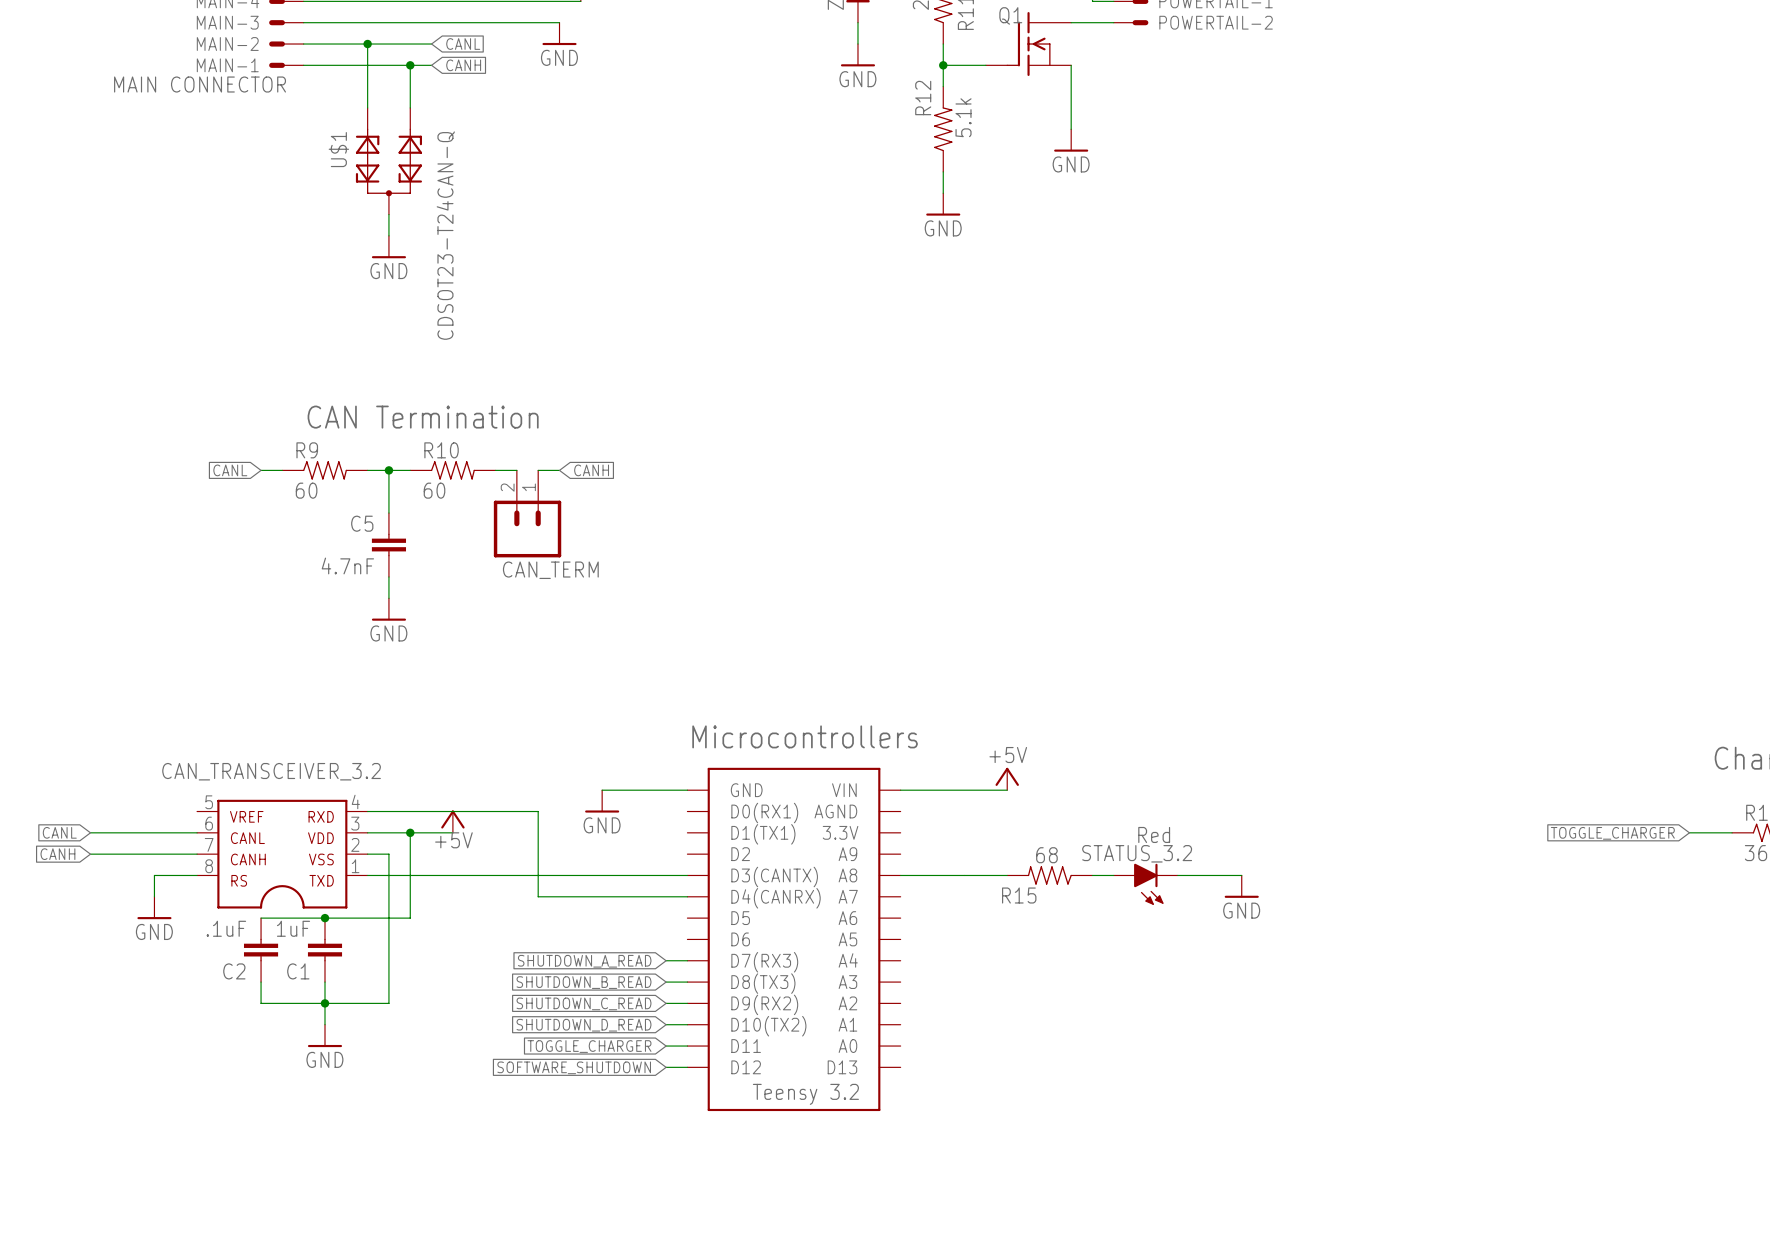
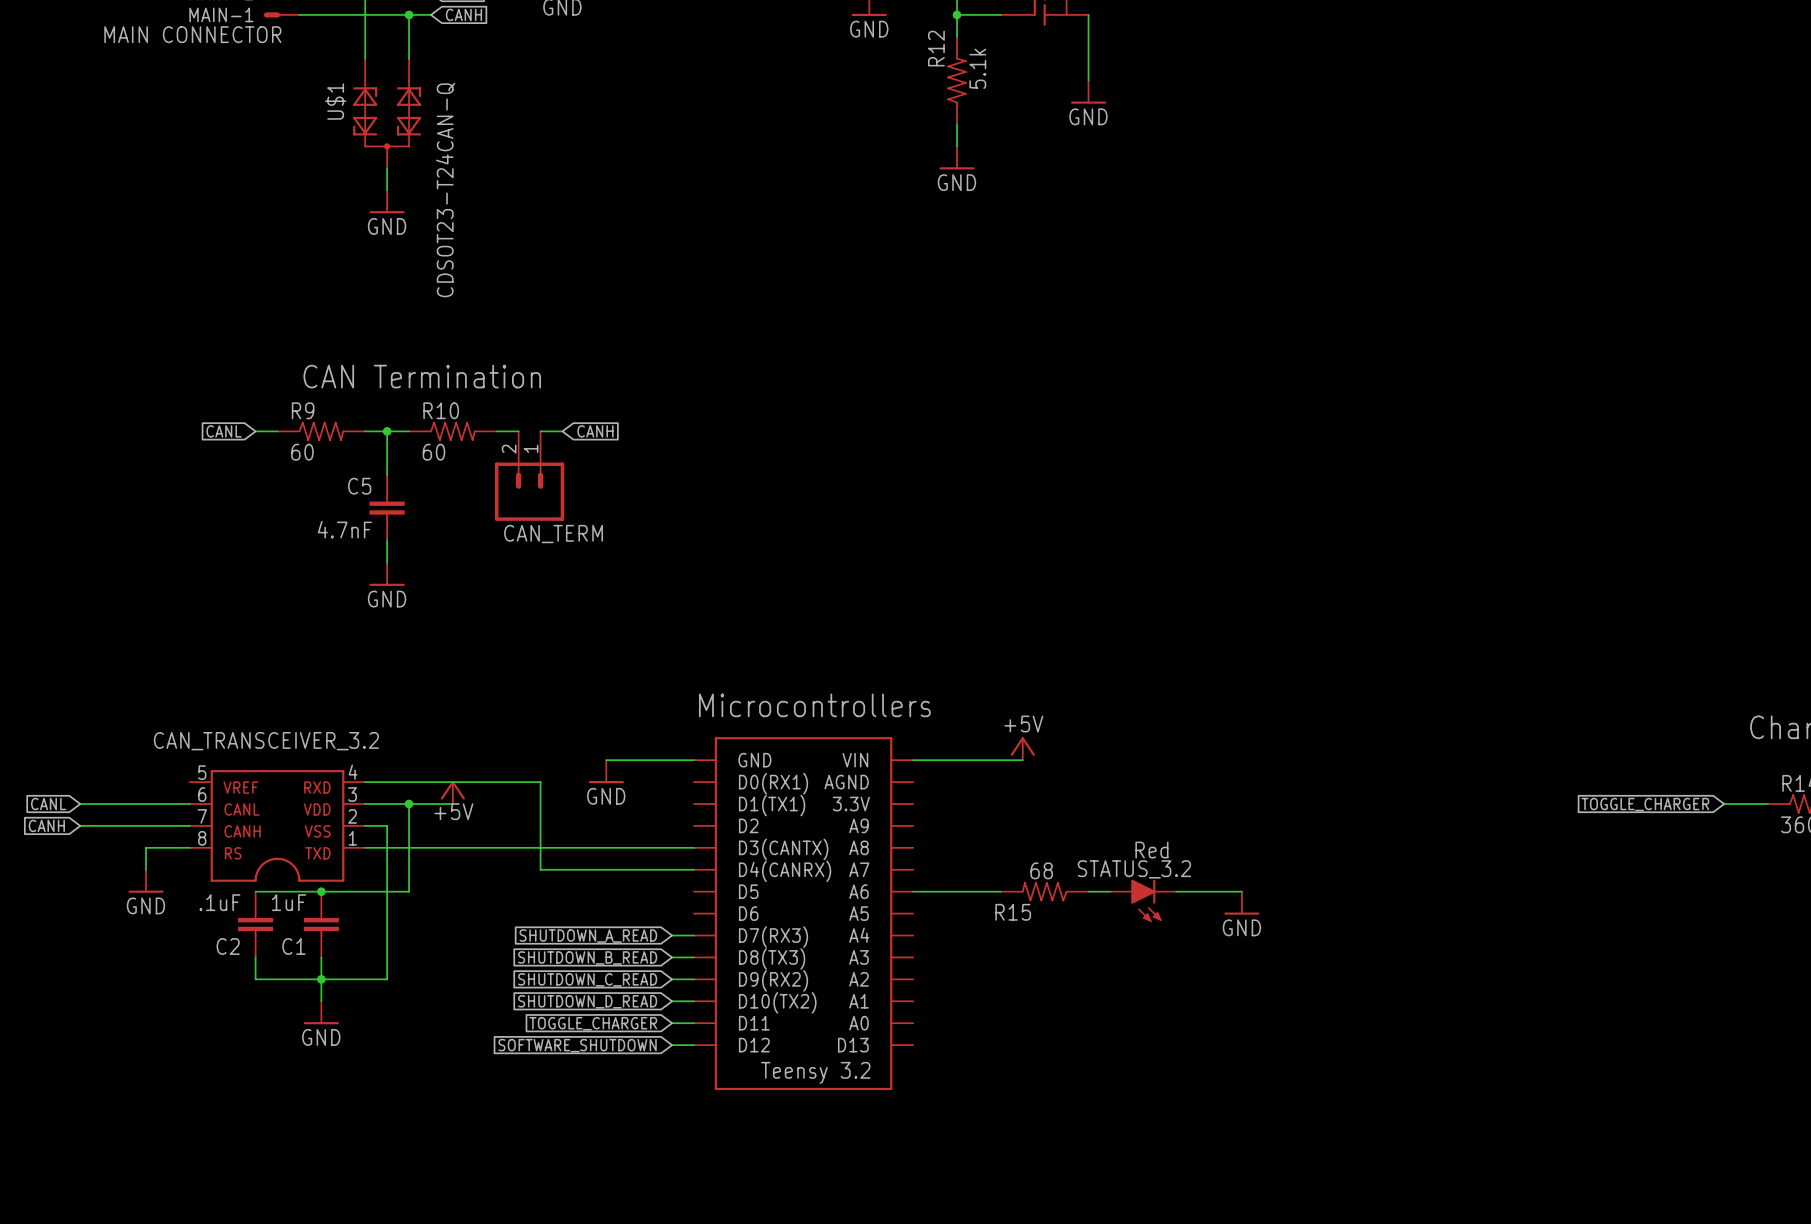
wire: (900, 875) (1007, 875) -> none
R15 position: (1049, 875) -> (1044, 891)
wire: (1092, 875) (1113, 875) -> (1088, 891) (1110, 891)
wire: (1177, 875) (1241, 875) -> (1176, 891) (1241, 891)
STATUS_3.2 position: (1145, 884) -> (1143, 900)
power symbol position: GND (1241, 886) -> GND (1241, 903)
wire: none -> (913, 891) (1000, 891)

